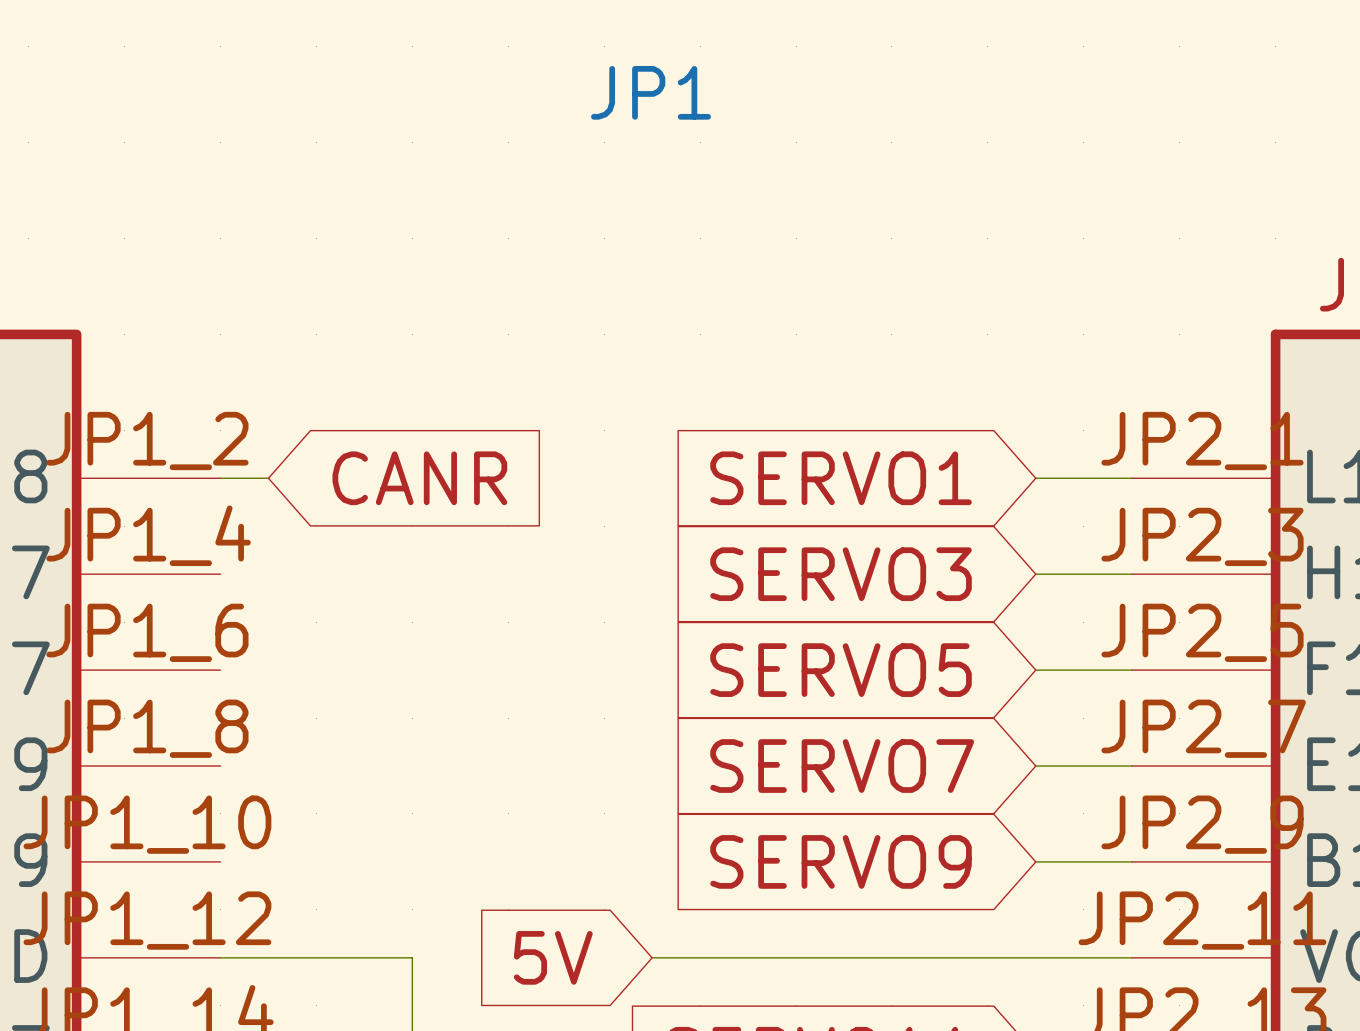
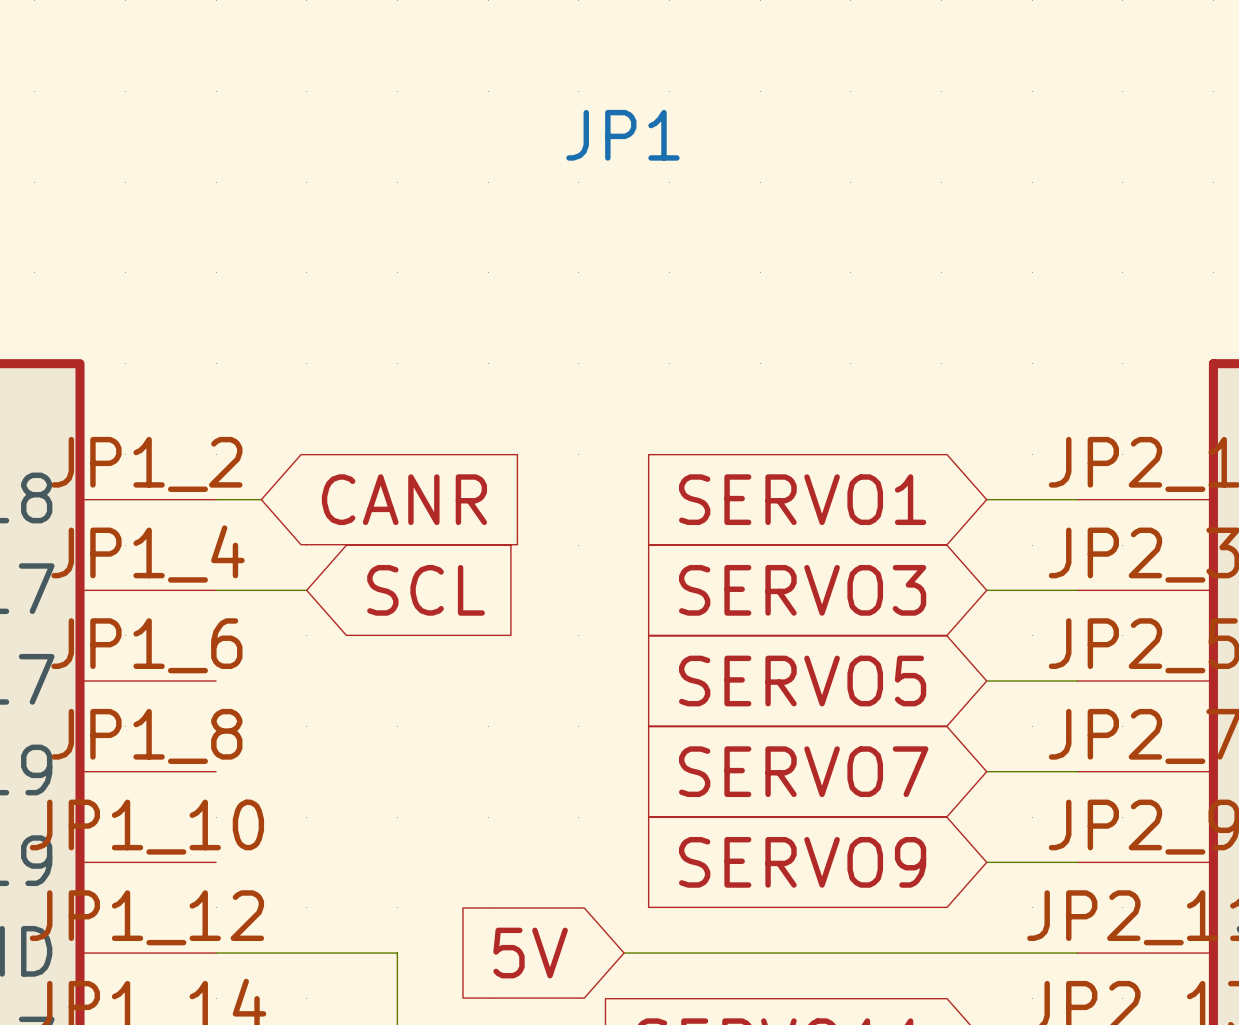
wire: none -> (216, 590) (306, 590)
global label: none -> SCL (426, 590)

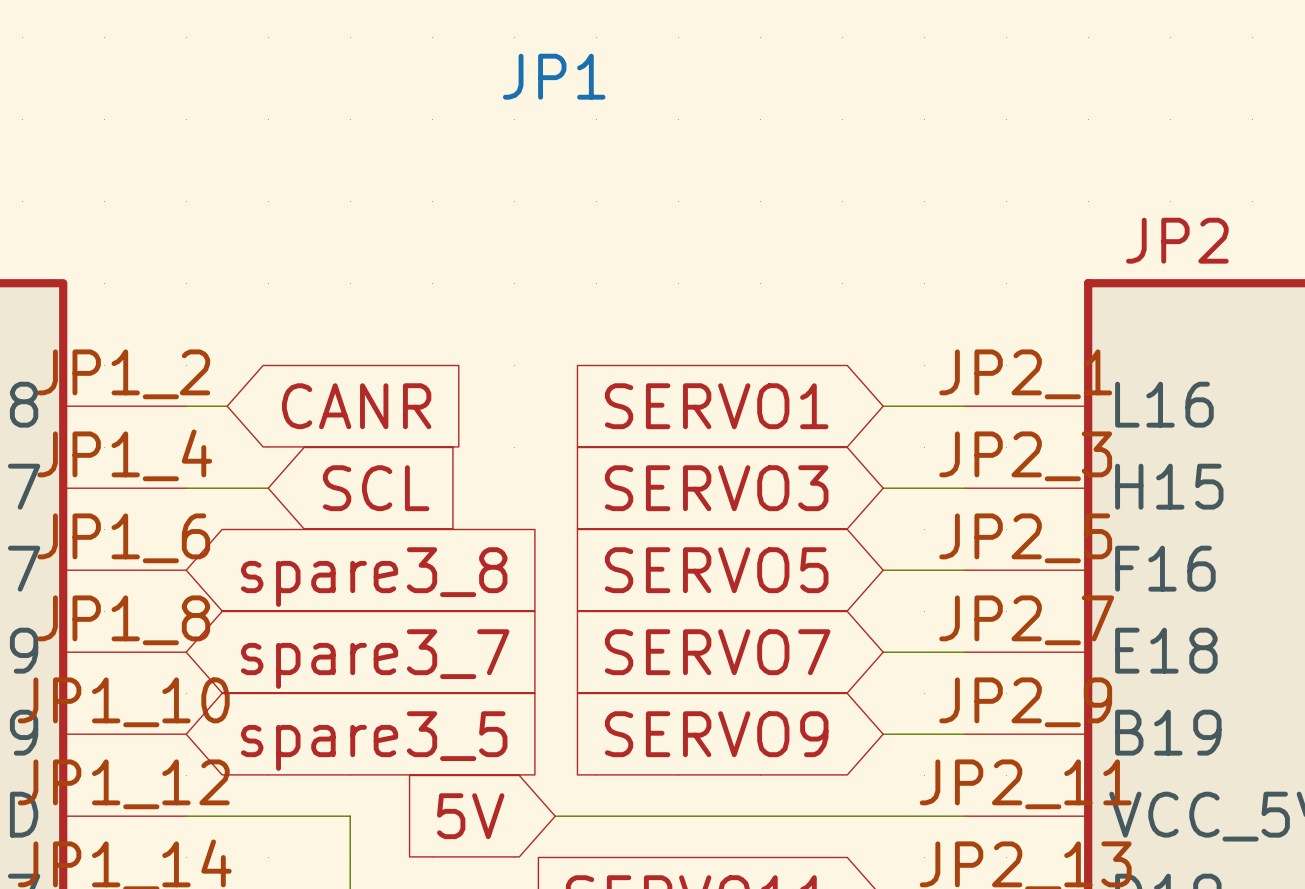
global label: none -> spare3_8 (374, 577)
global label: none -> spare3_7 (375, 659)
global label: none -> spare3_5 (374, 741)

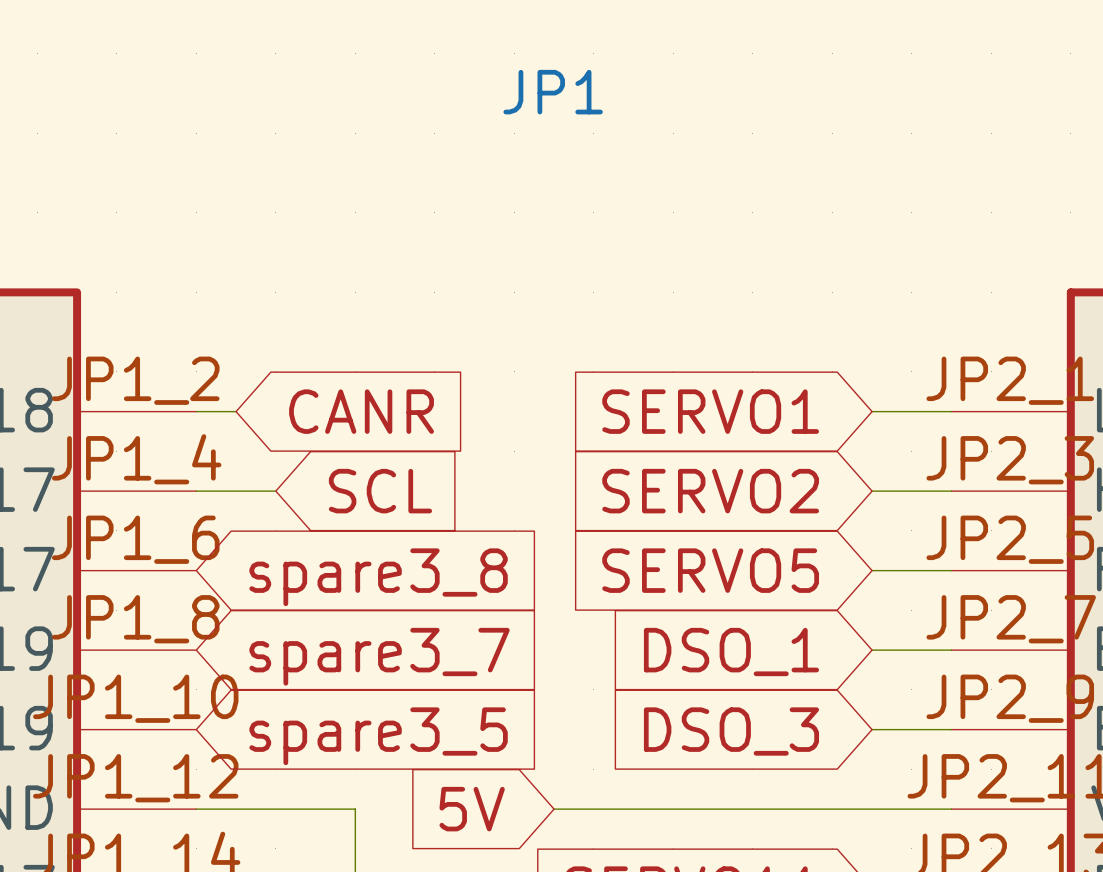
global label: SERVO3 (716, 488) -> SERVO2 (710, 491)
global label: SERVO7 (717, 652) -> DSO_1 (731, 652)
global label: SERVO9 (716, 734) -> DSO_3 (731, 731)

